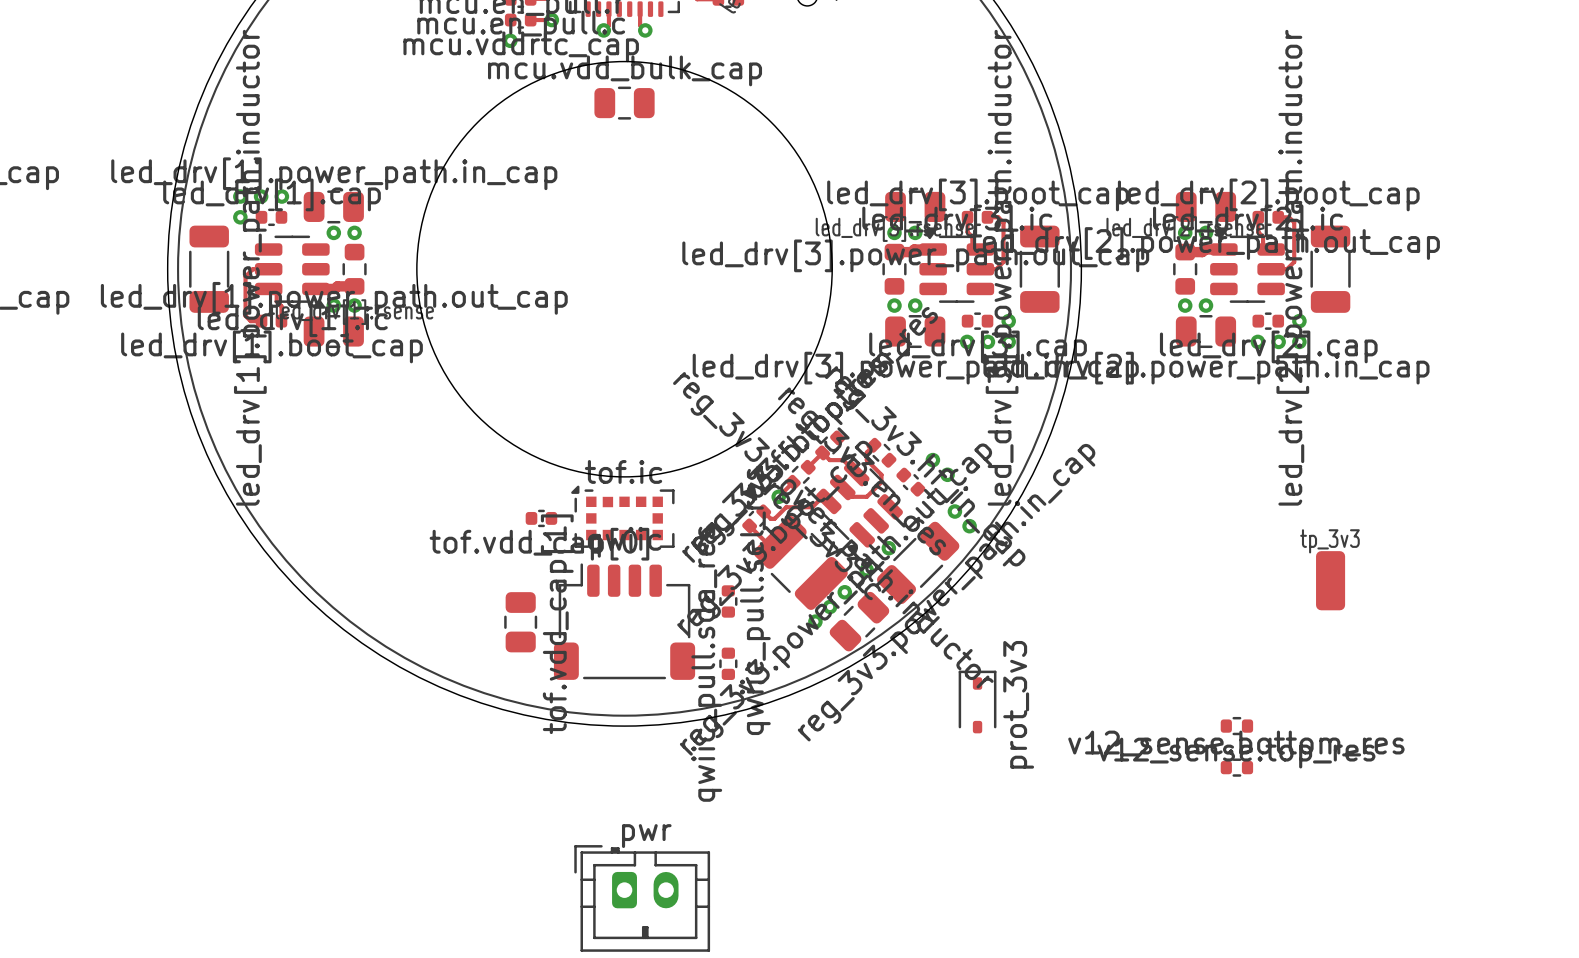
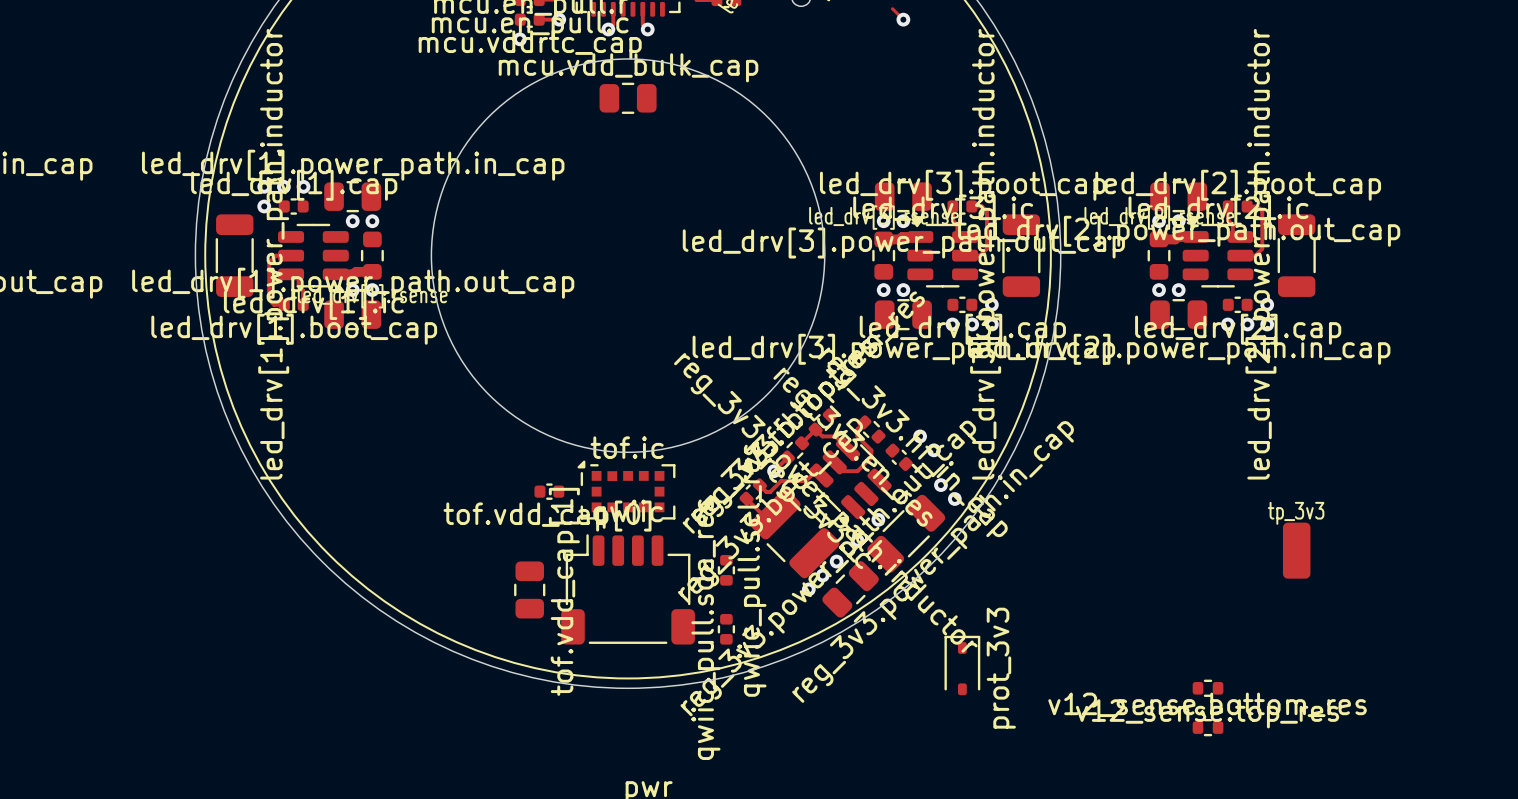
track: none -> (892, 8) (903, 19)
via: none -> (903, 19)

